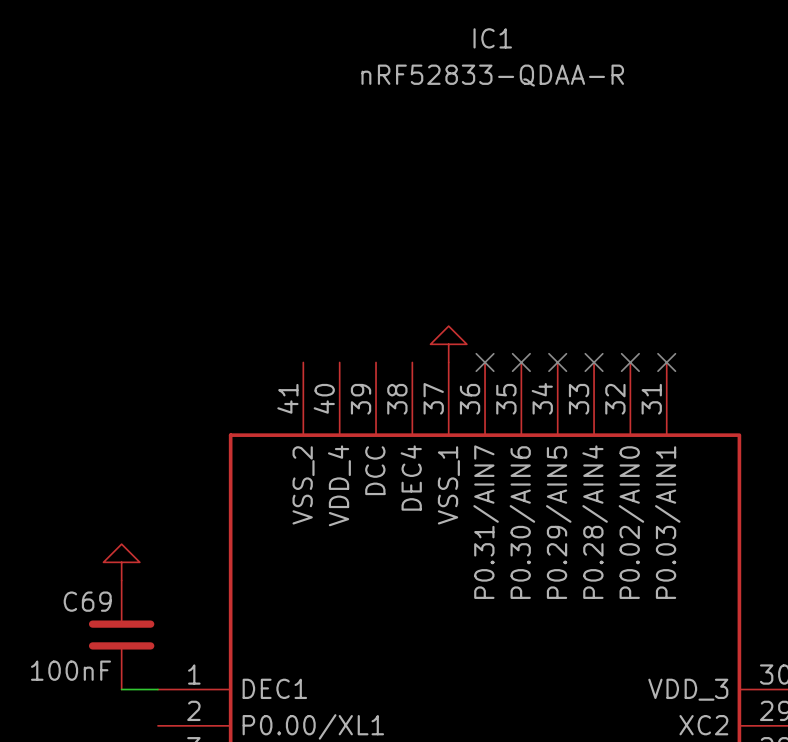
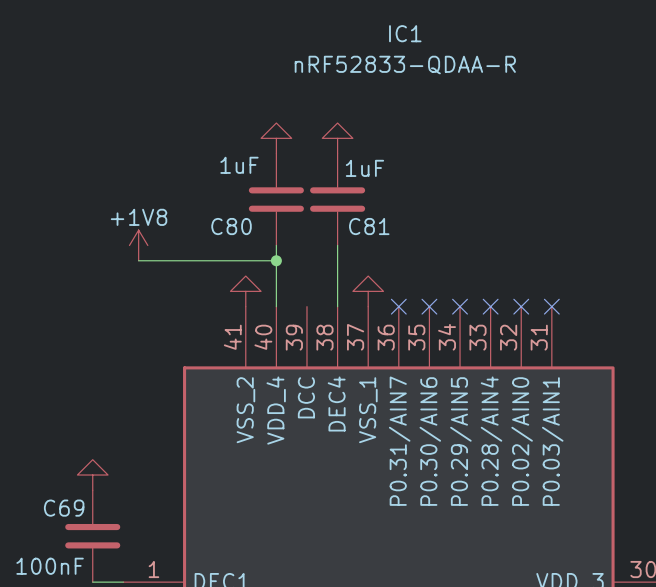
power symbol: none -> (276, 138)
power symbol: none -> (337, 138)
C80: none -> 1uF (276, 199)
C81: none -> 1uF (337, 199)
power symbol: none -> +1V8 (138, 245)
wire: none -> (276, 245) (276, 306)
wire: none -> (337, 245) (337, 306)
wire: none -> (138, 260) (276, 260)
junction: none -> (276, 260)
power symbol: none -> (245, 291)

